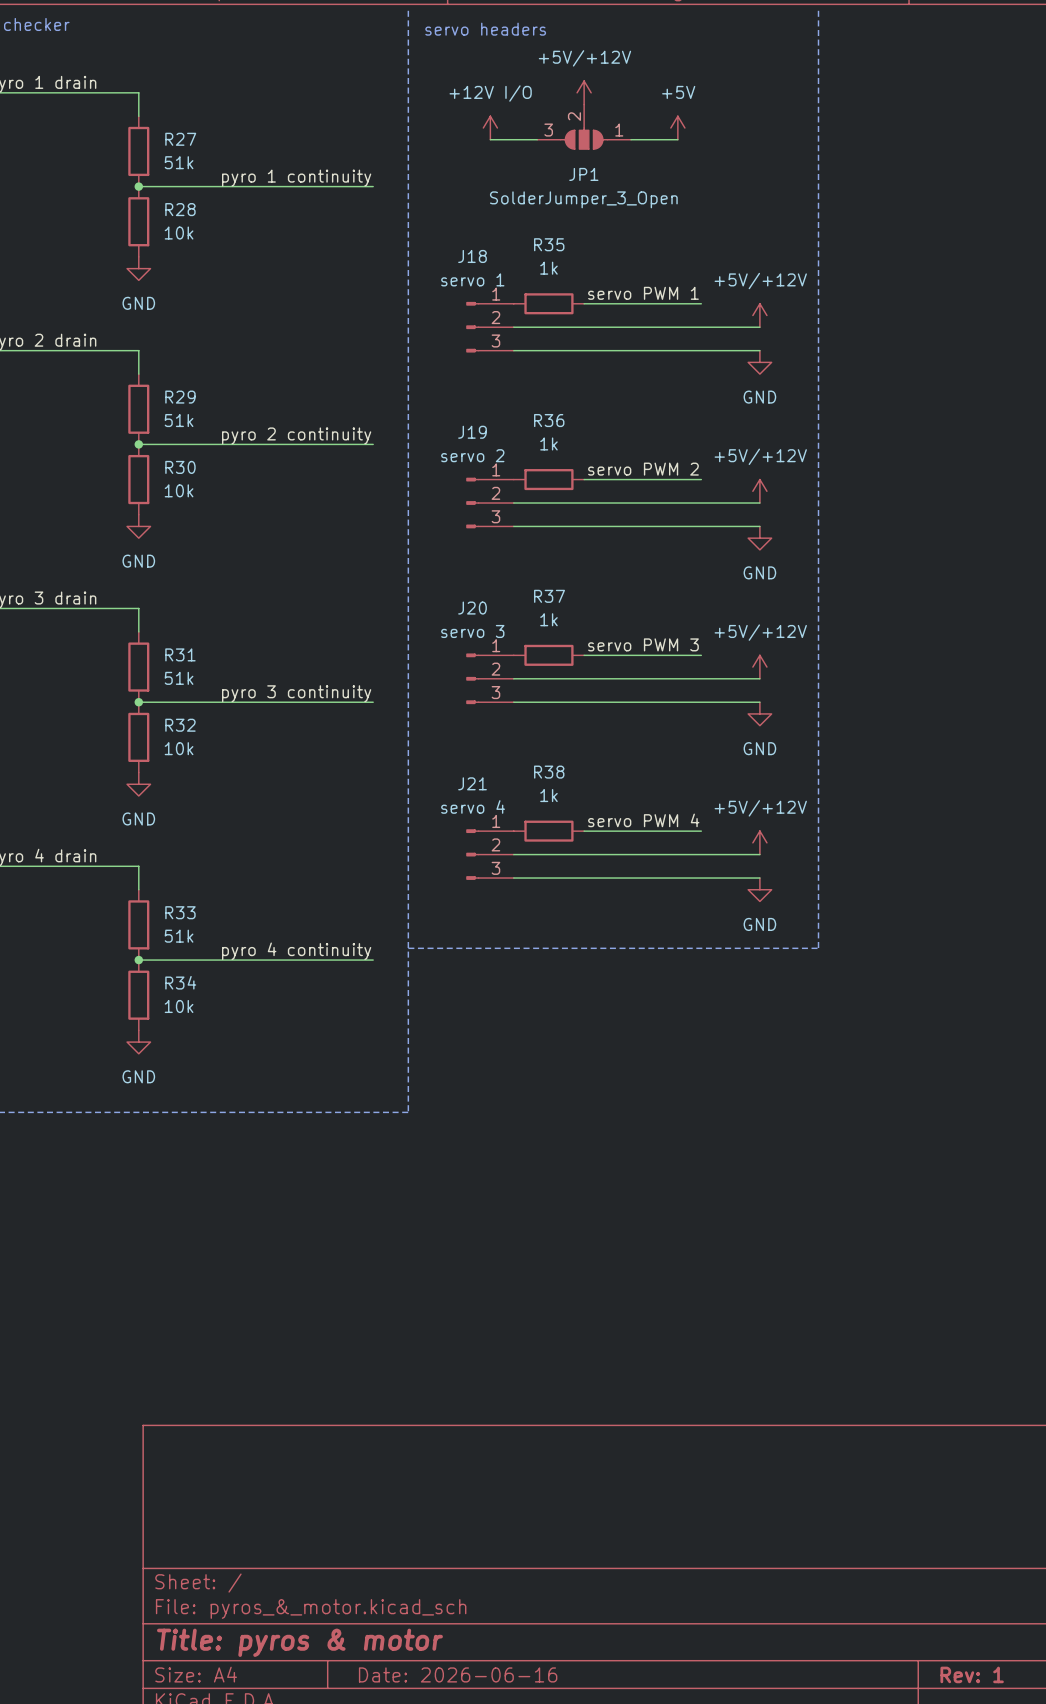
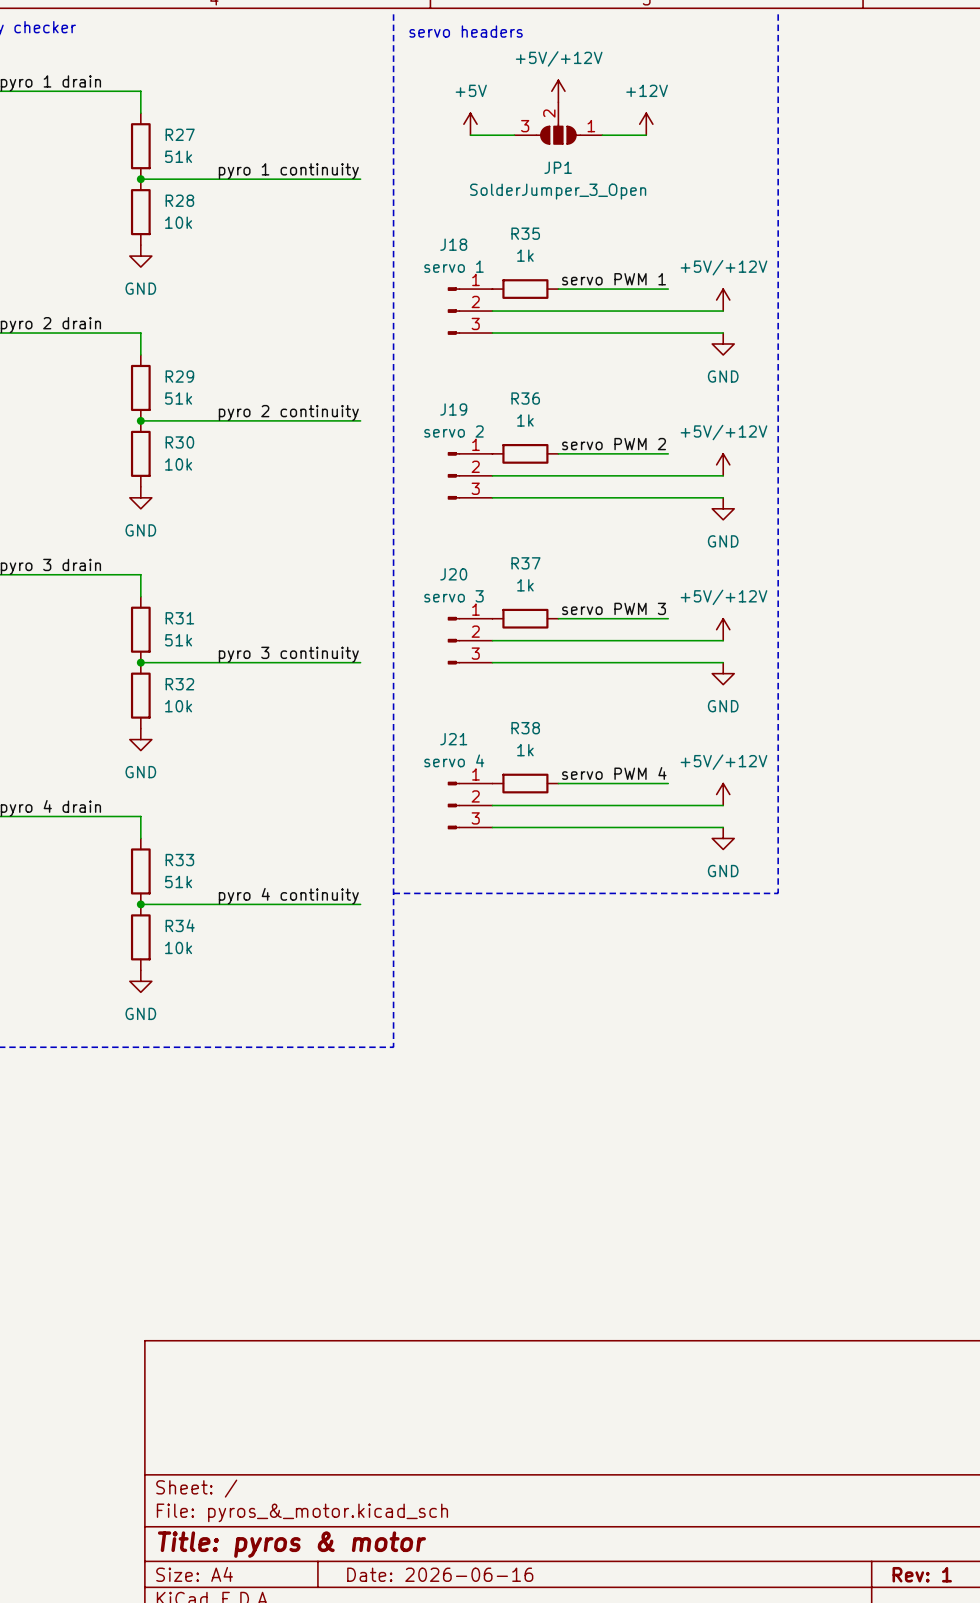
power symbol: +12V I/O (490, 128) -> +5V (470, 124)
power symbol: +5V (677, 128) -> +12V (646, 124)

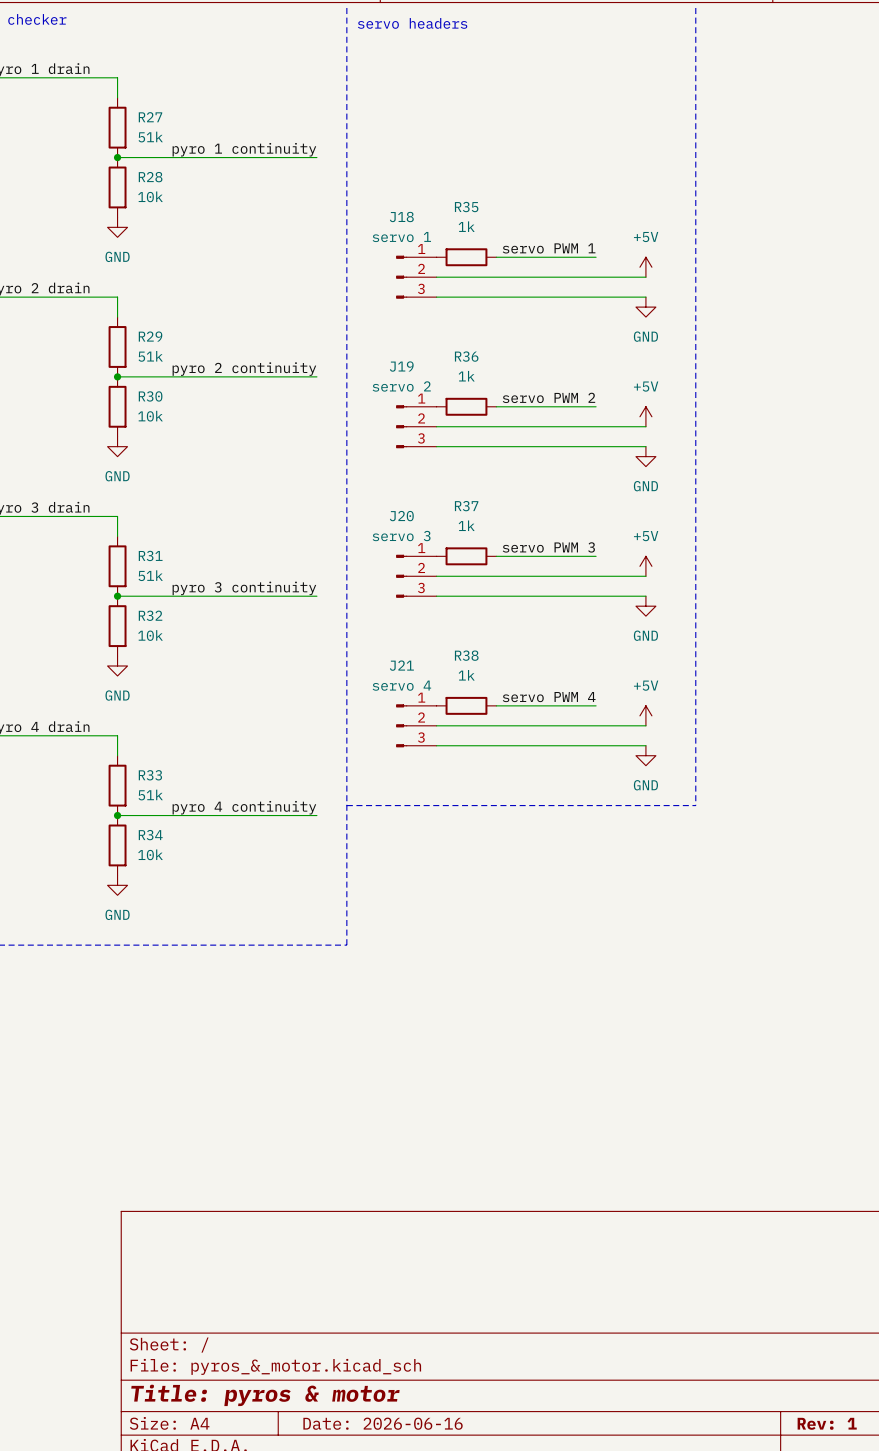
power symbol: +5V/+12V (558, 91) -> none
JP1: SolderJumper_3_Open (558, 123) -> none
power symbol: +5V (470, 124) -> none
power symbol: +12V (646, 124) -> none
wire: (470, 135) (514, 135) -> none
wire: (602, 135) (646, 135) -> none
power symbol: +5V/+12V (723, 300) -> +5V (645, 267)
power symbol: +5V/+12V (723, 464) -> +5V (645, 416)
power symbol: +5V/+12V (723, 629) -> +5V (645, 566)
power symbol: +5V/+12V (723, 794) -> +5V (645, 715)

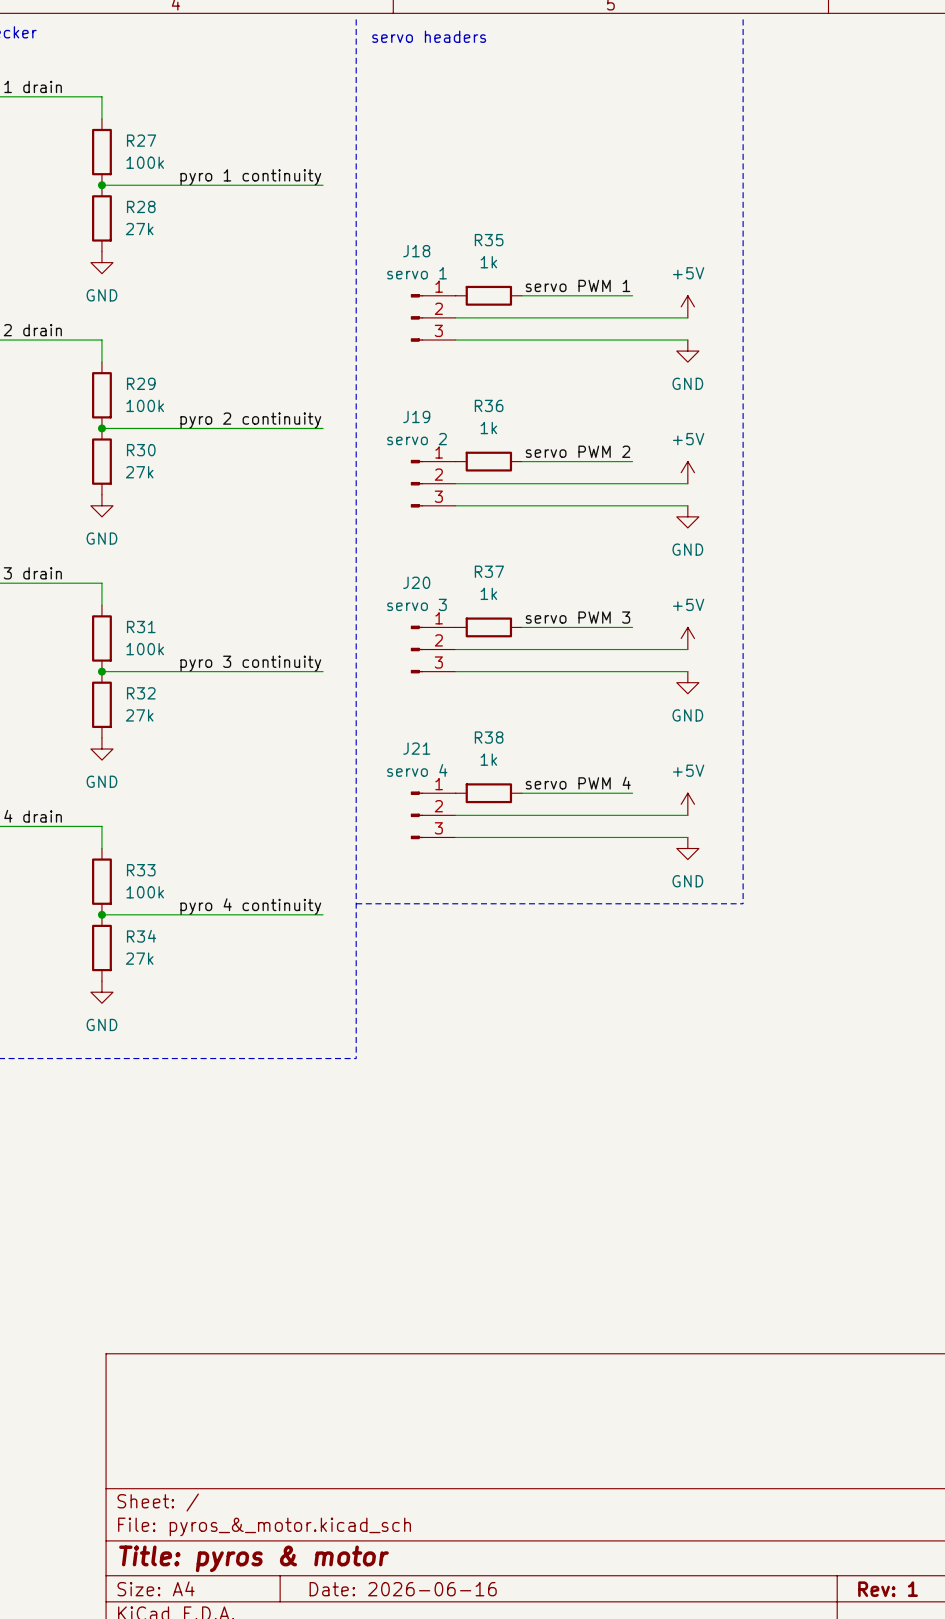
R27 value: 51k (150, 137) -> 100k (145, 162)
R28 value: 10k (150, 196) -> 27k (139, 229)
R29 value: 51k (150, 356) -> 100k (145, 405)
R30 value: 10k (150, 416) -> 27k (139, 472)
R31 value: 51k (150, 575) -> 100k (145, 649)
R32 value: 10k (150, 635) -> 27k (139, 715)
R33 value: 51k (150, 795) -> 100k (145, 892)
R34 value: 10k (150, 854) -> 27k (139, 958)

